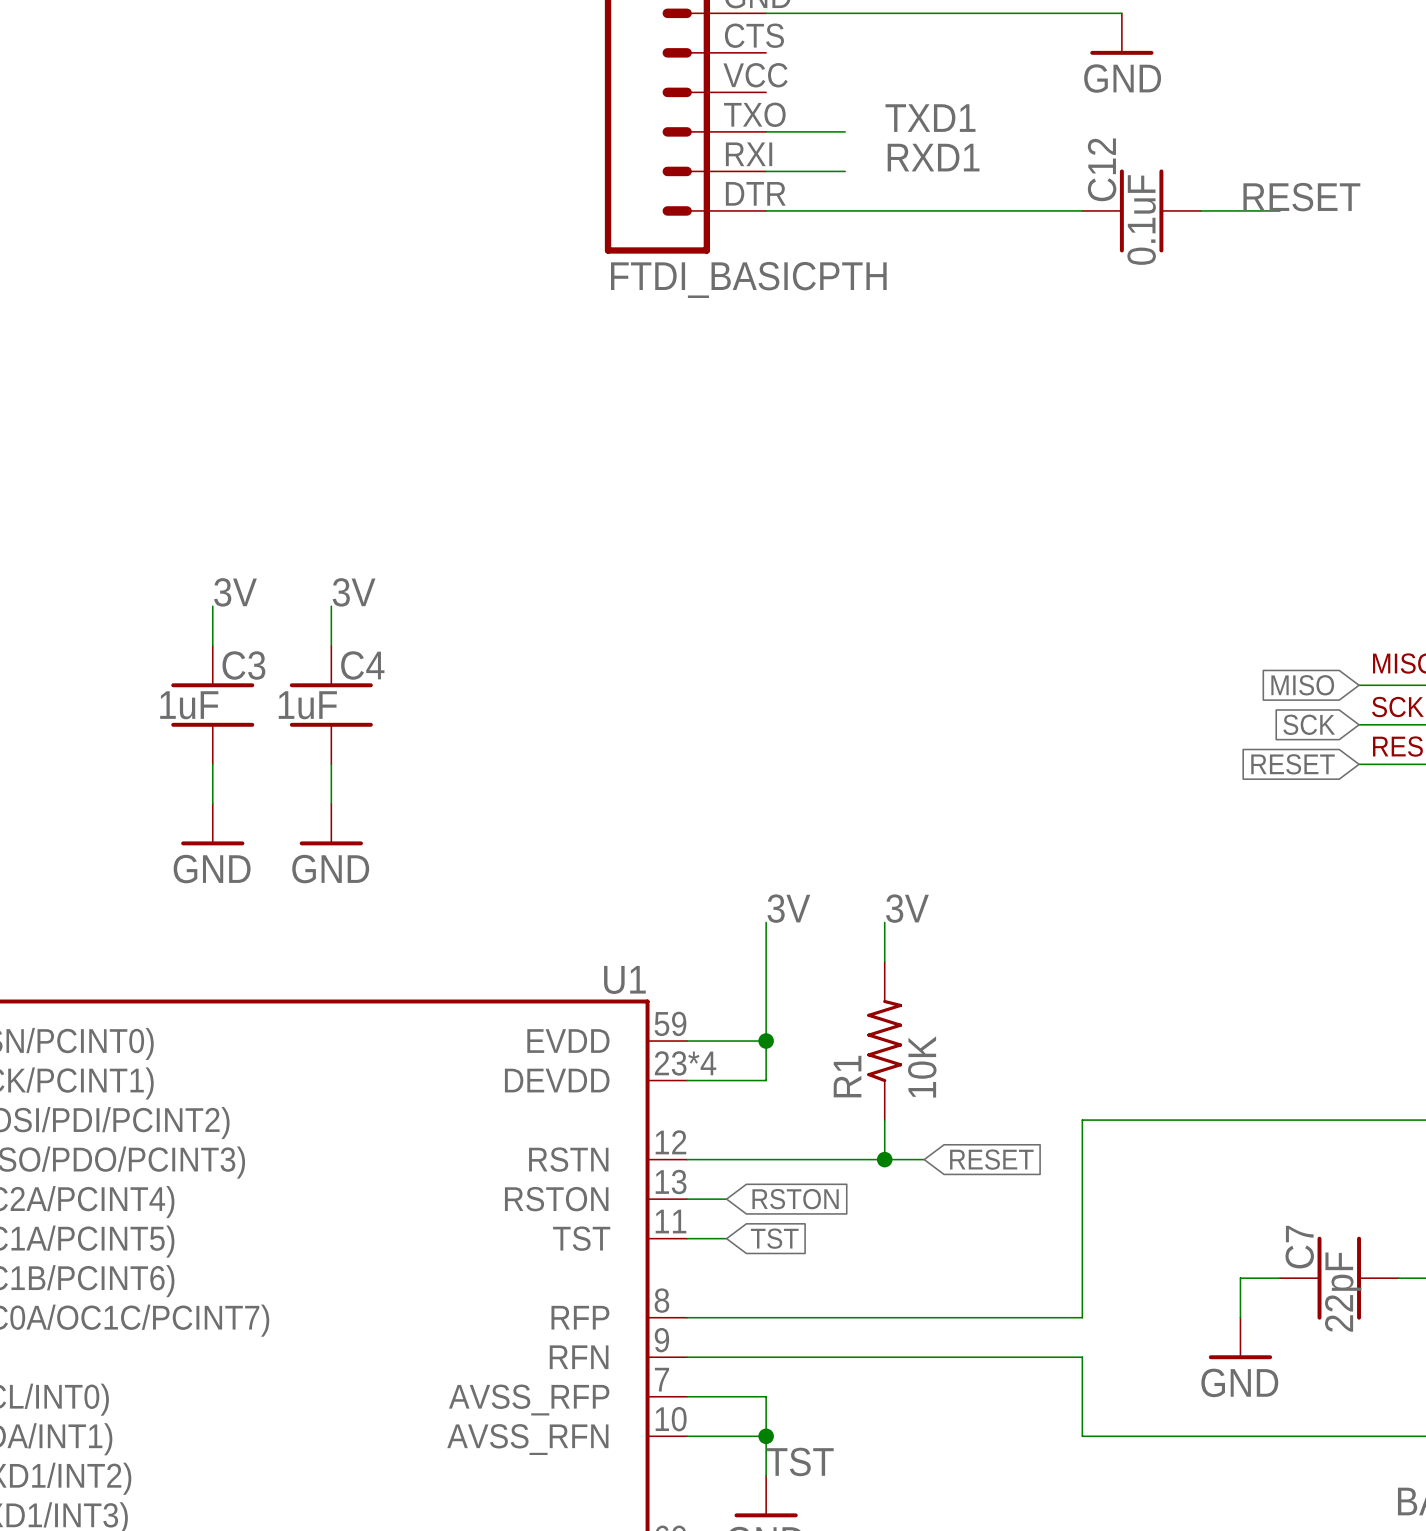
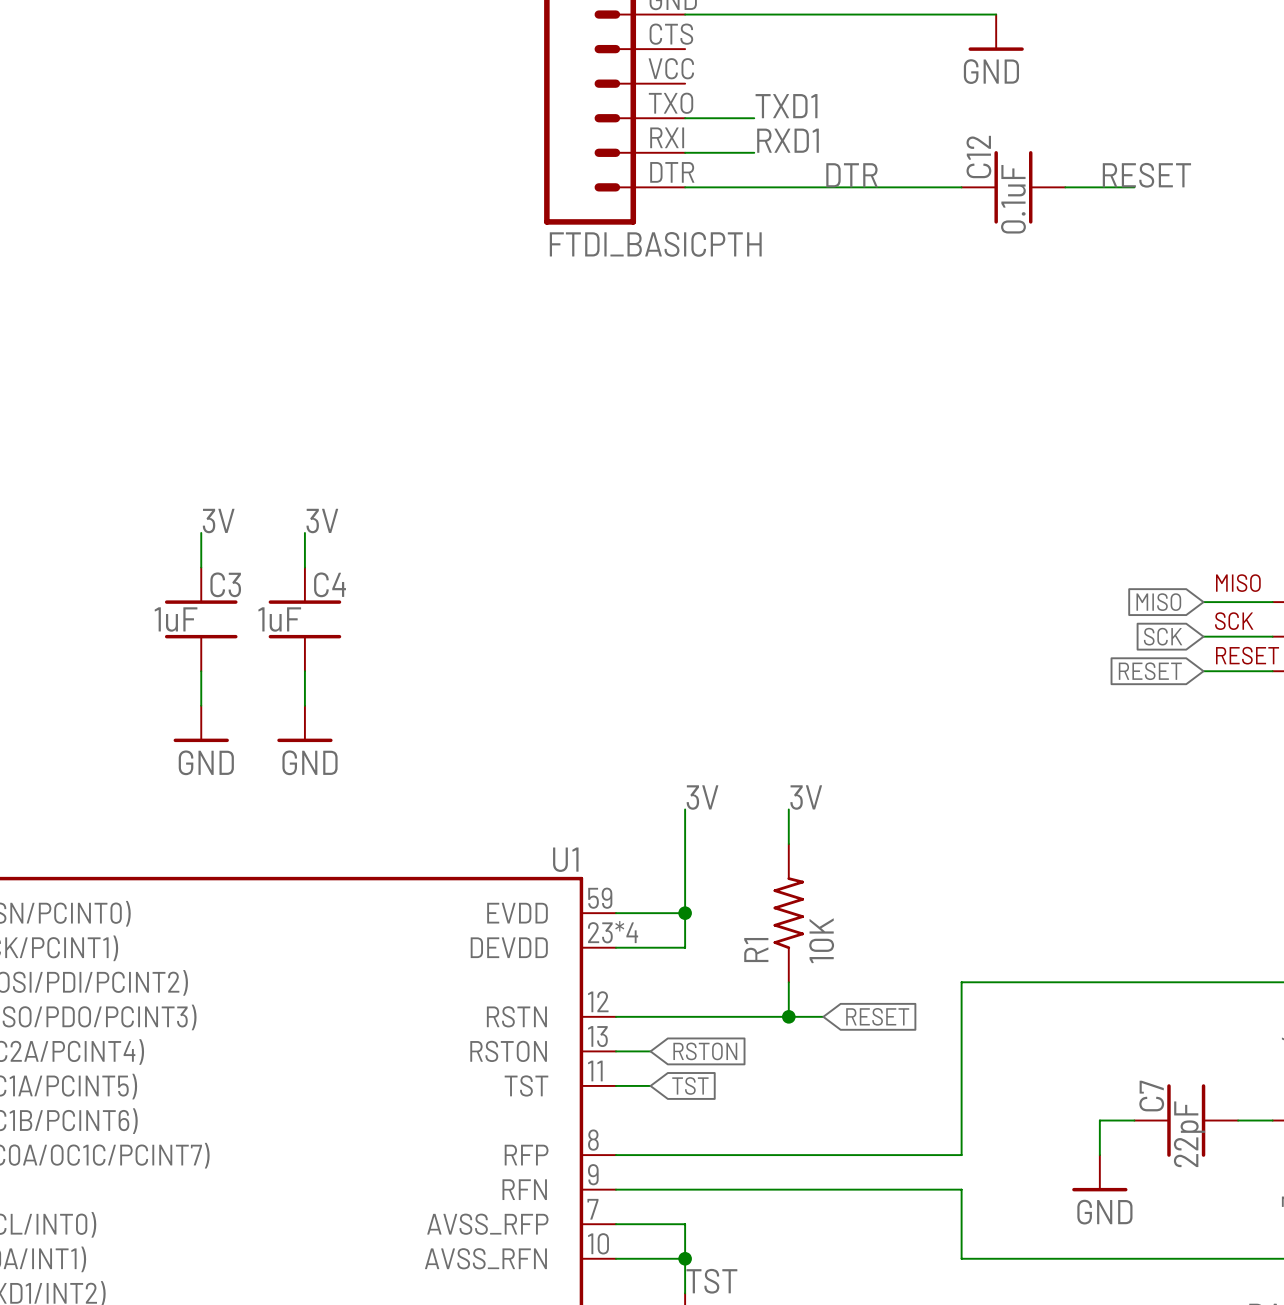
label position: TXD1 (930, 118) -> TXD1 (786, 106)
label position: RXD1 (933, 157) -> RXD1 (787, 140)
label: none -> DTR (852, 175)

